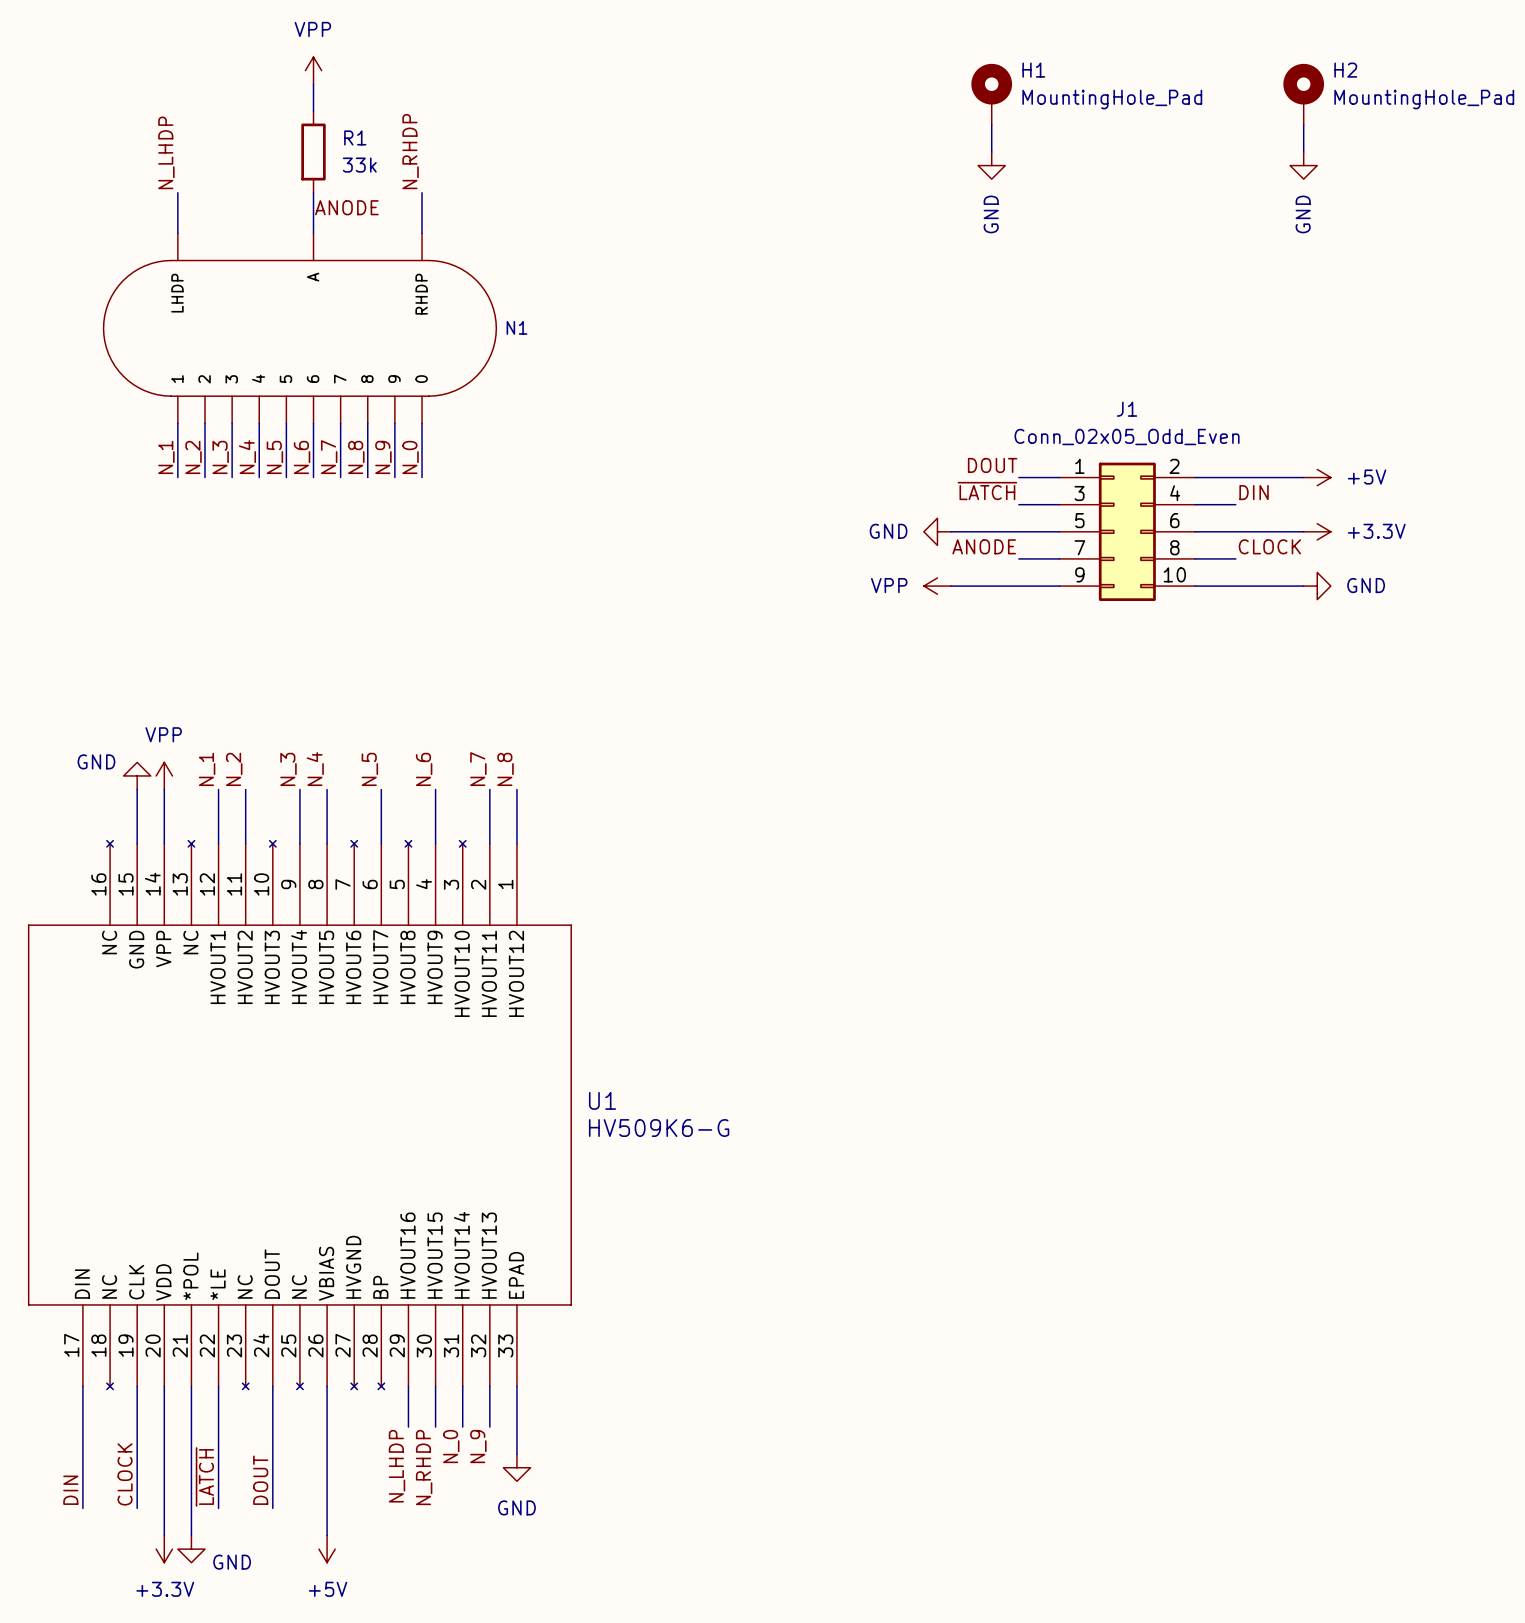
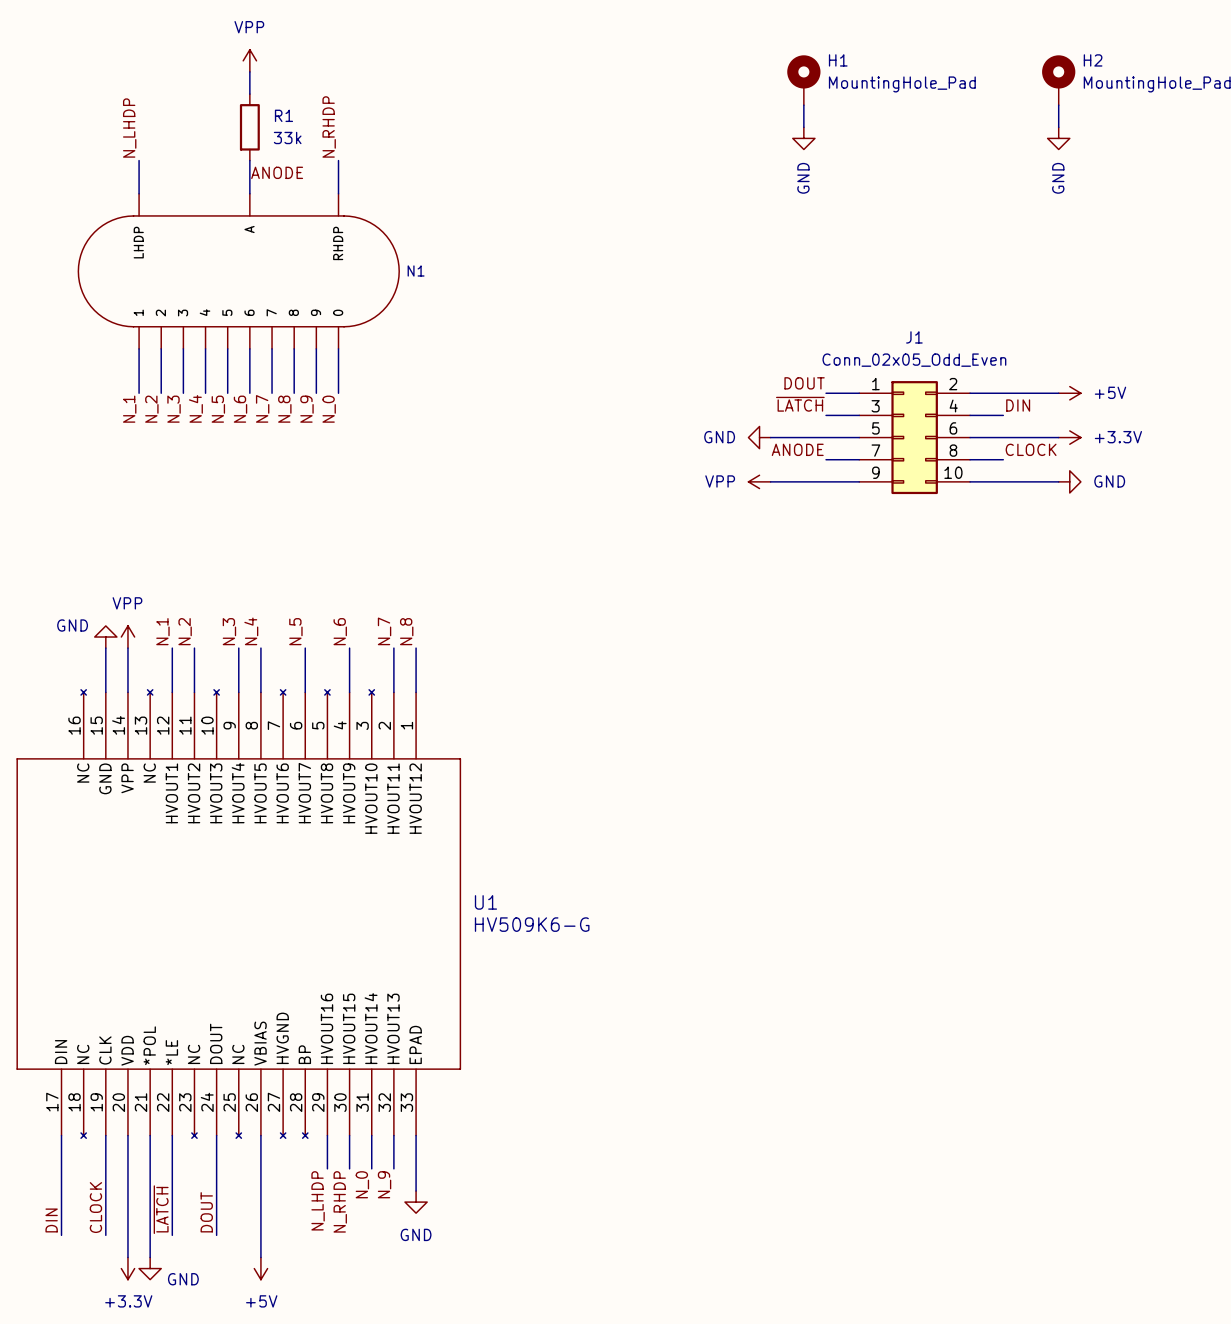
label position: N_1 (166, 457) -> N_1 (129, 409)
label position: N_2 (193, 457) -> N_2 (151, 409)
label position: N_3 (220, 457) -> N_3 (174, 409)
label position: N_4 (247, 457) -> N_4 (195, 408)
label position: N_5 (274, 457) -> N_5 (218, 409)
label position: N_6 (302, 457) -> N_6 (240, 409)
label position: N_7 (329, 457) -> N_7 (262, 408)
label position: N_8 (356, 457) -> N_8 (284, 409)
label position: N_9 (383, 457) -> N_9 (306, 409)
label position: N_0 (410, 457) -> N_0 (329, 409)

